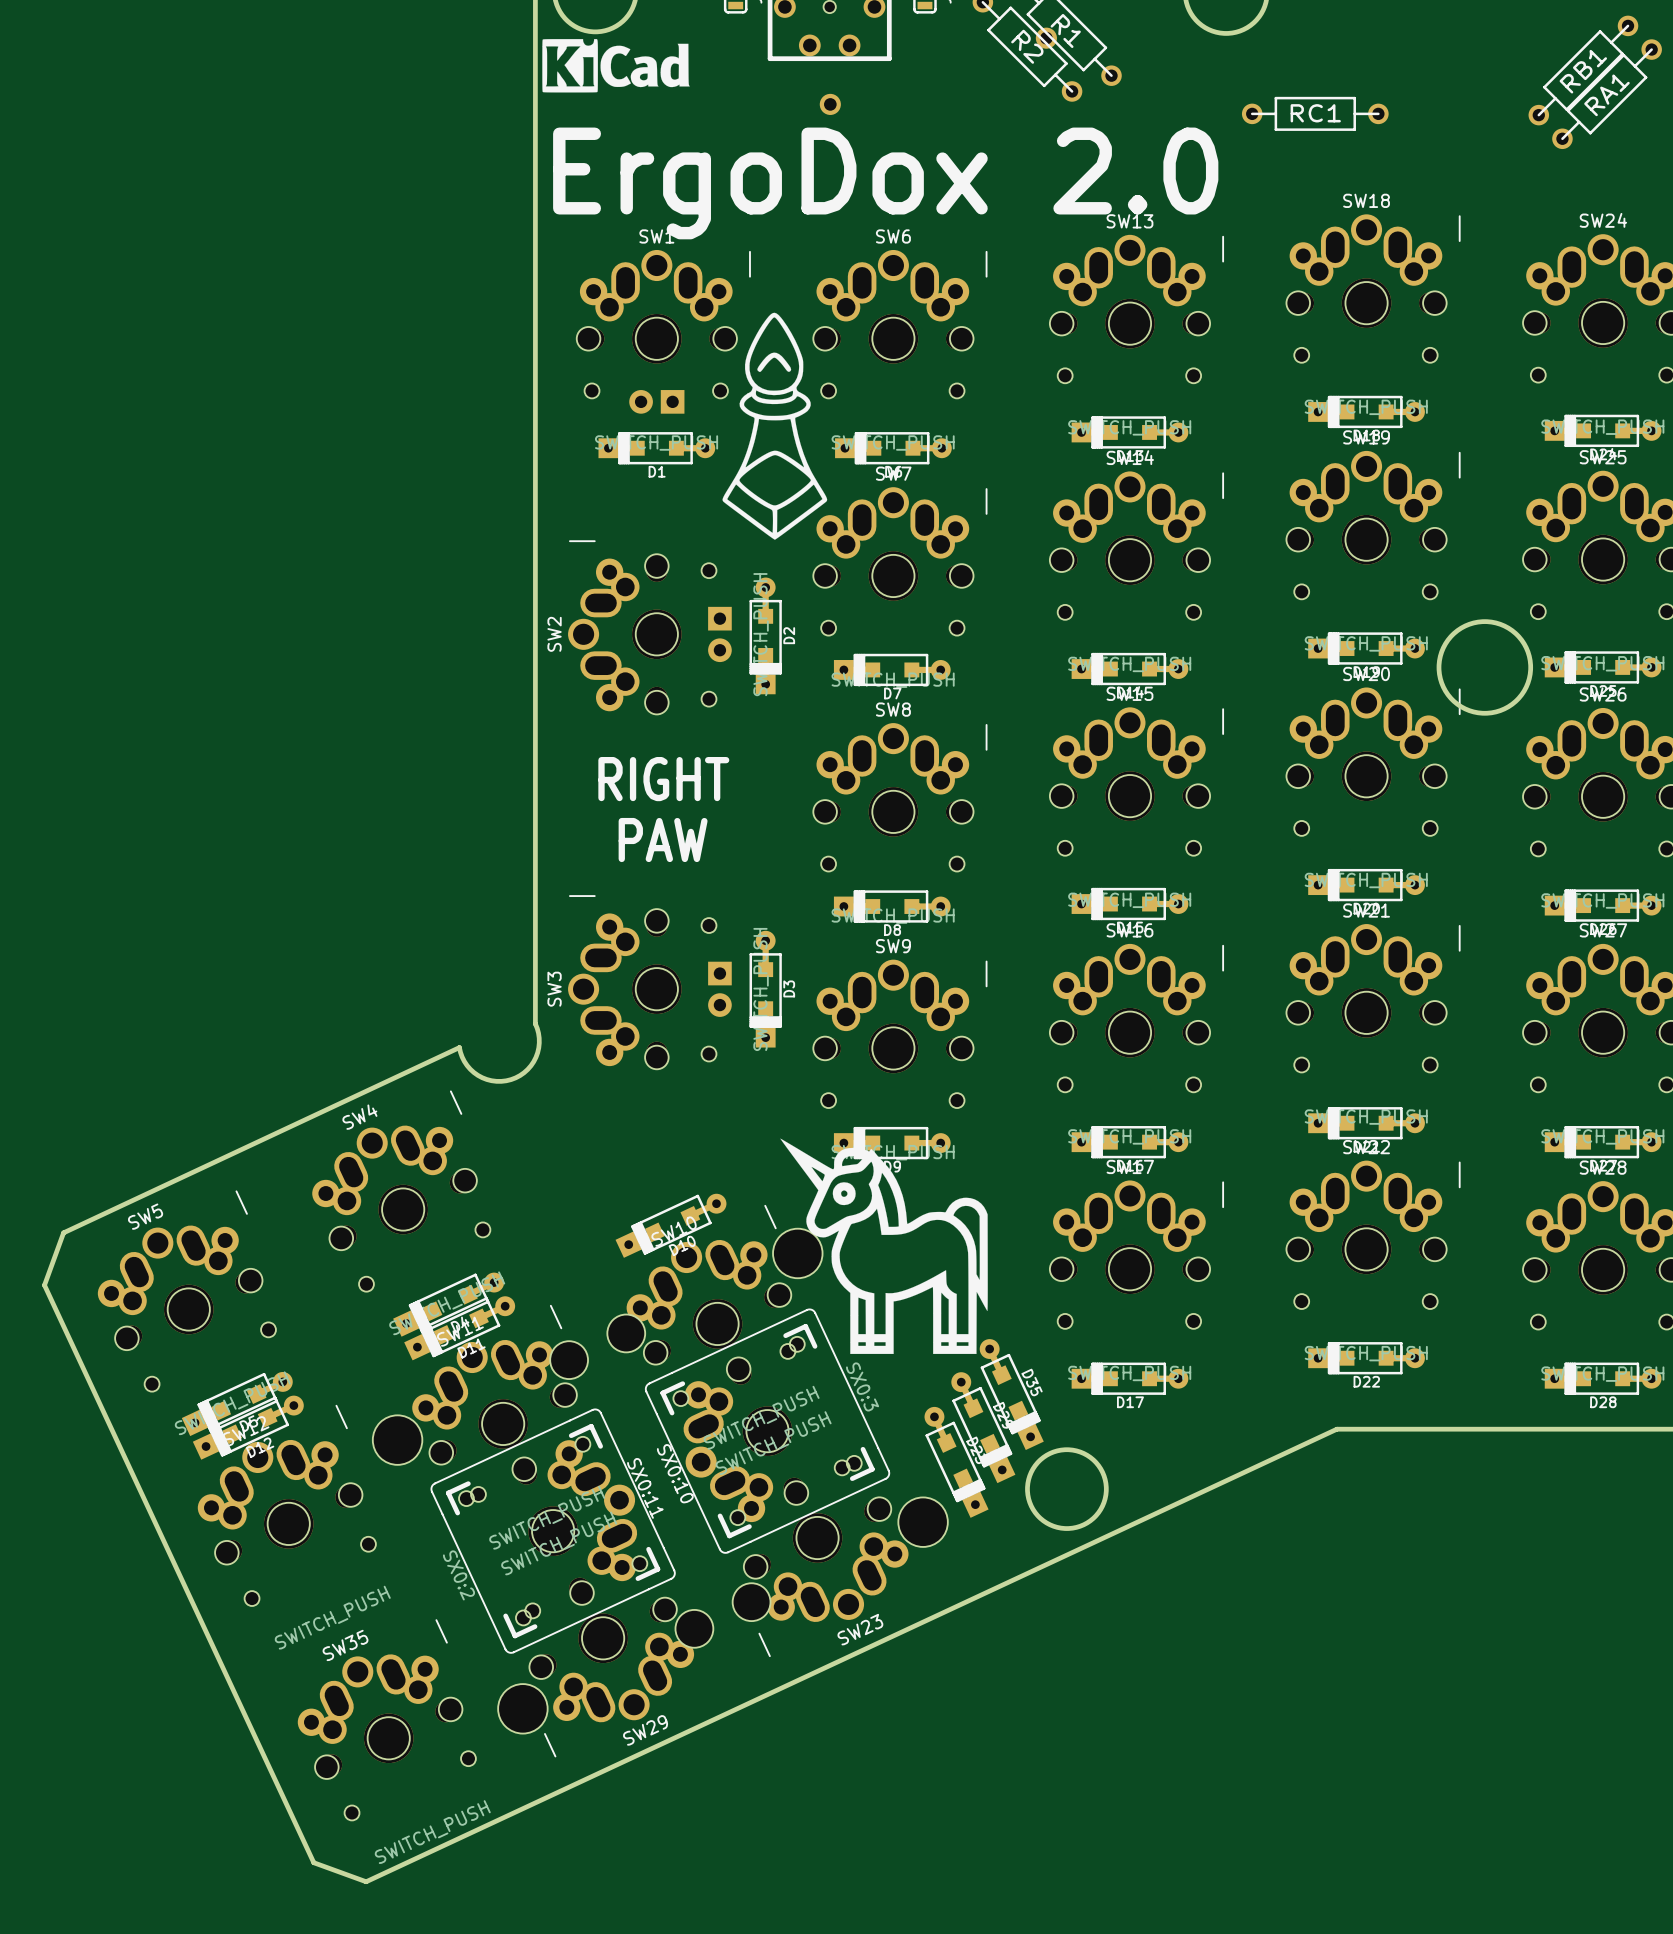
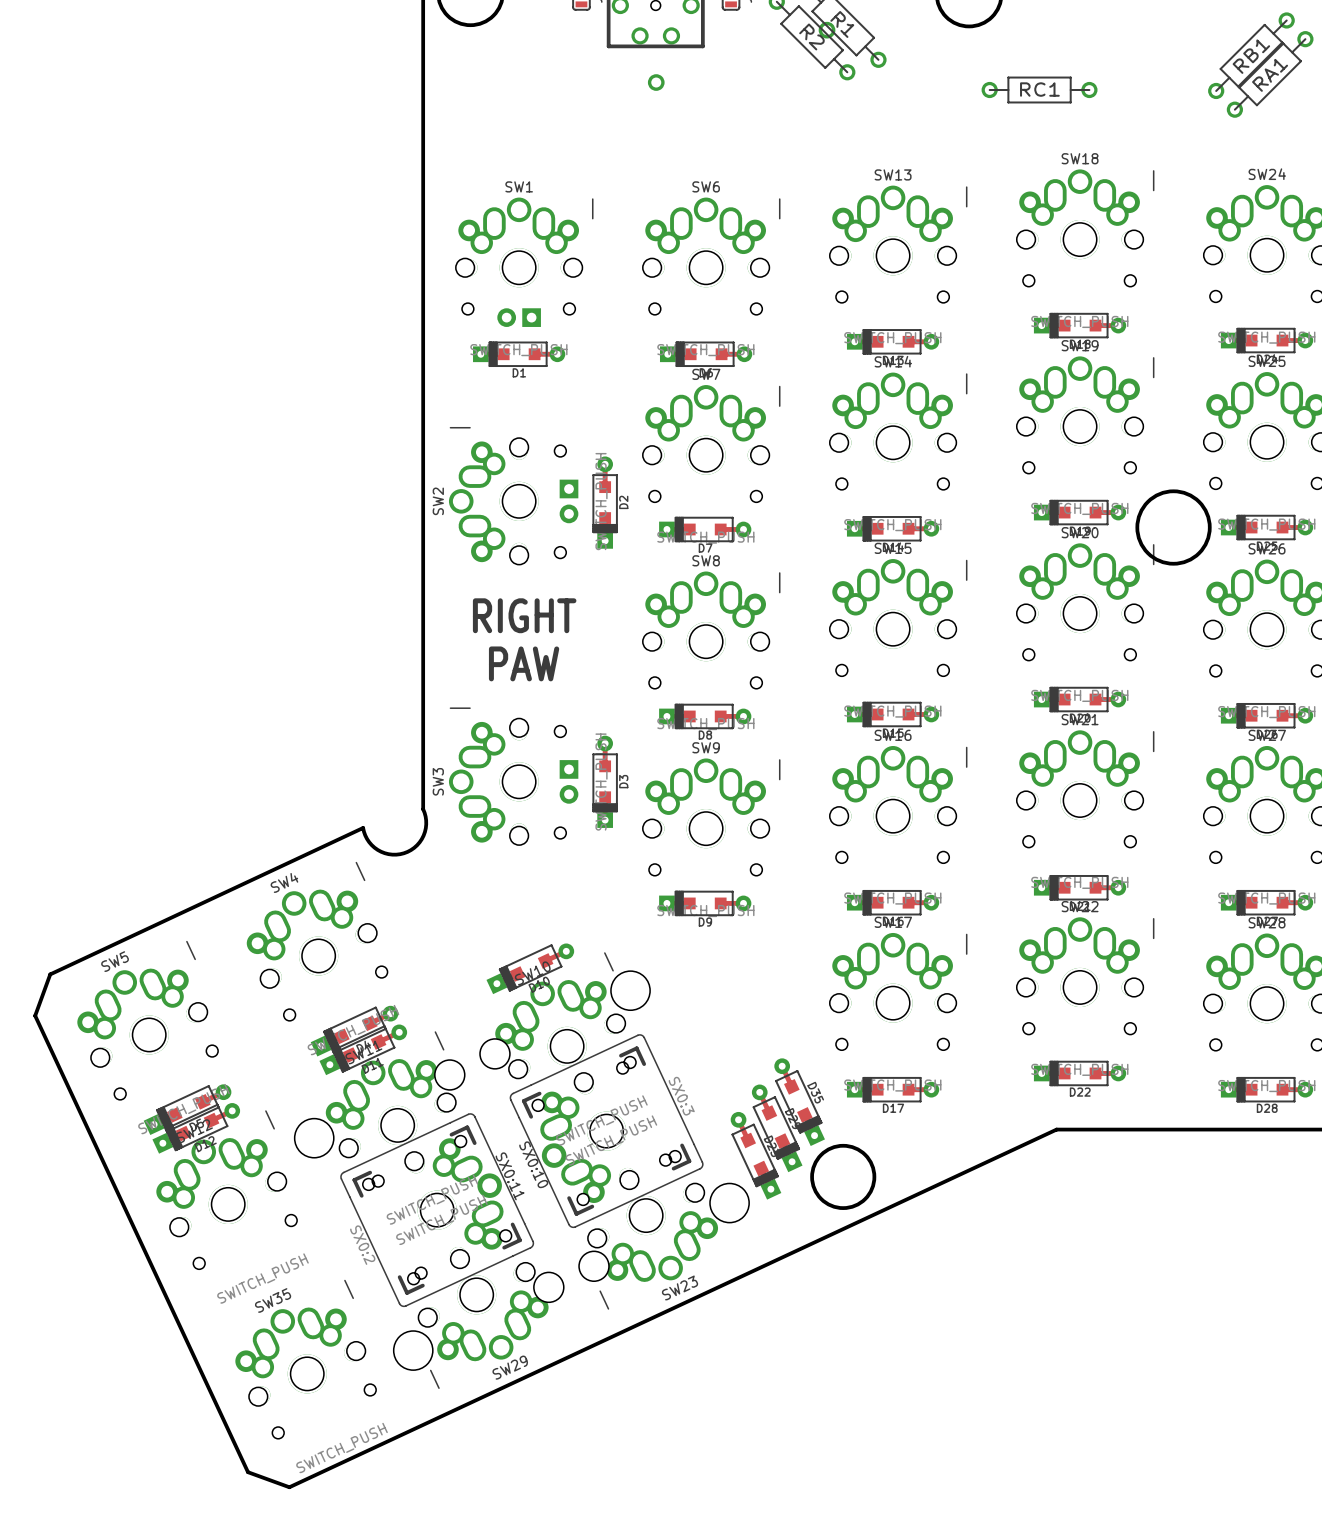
drawing: [542, 39, 690, 93] -> none
text: ErgoDox 2.0 (885, 183) -> none
drawing: [722, 312, 828, 540] -> none
drawing: [780, 1138, 988, 1354] -> none

